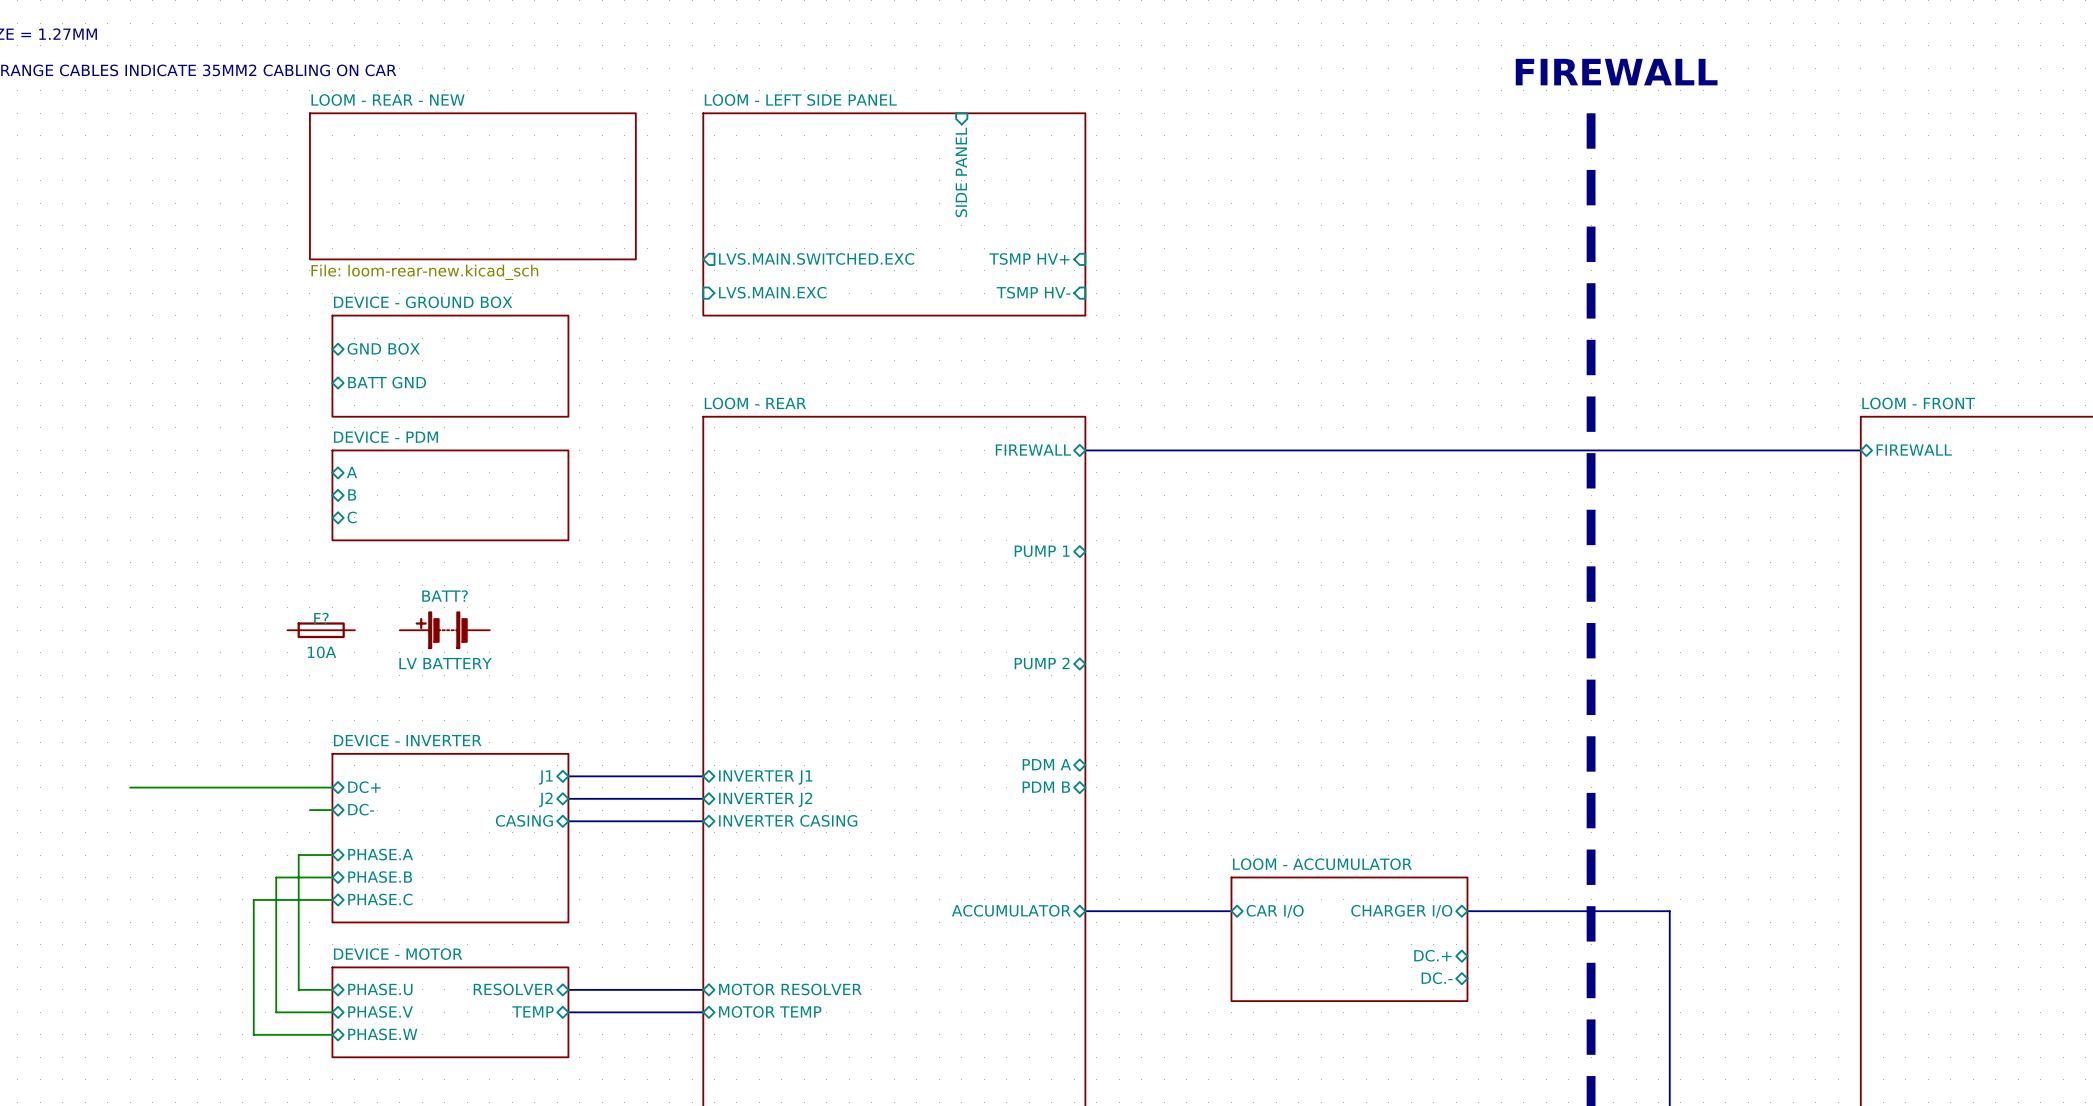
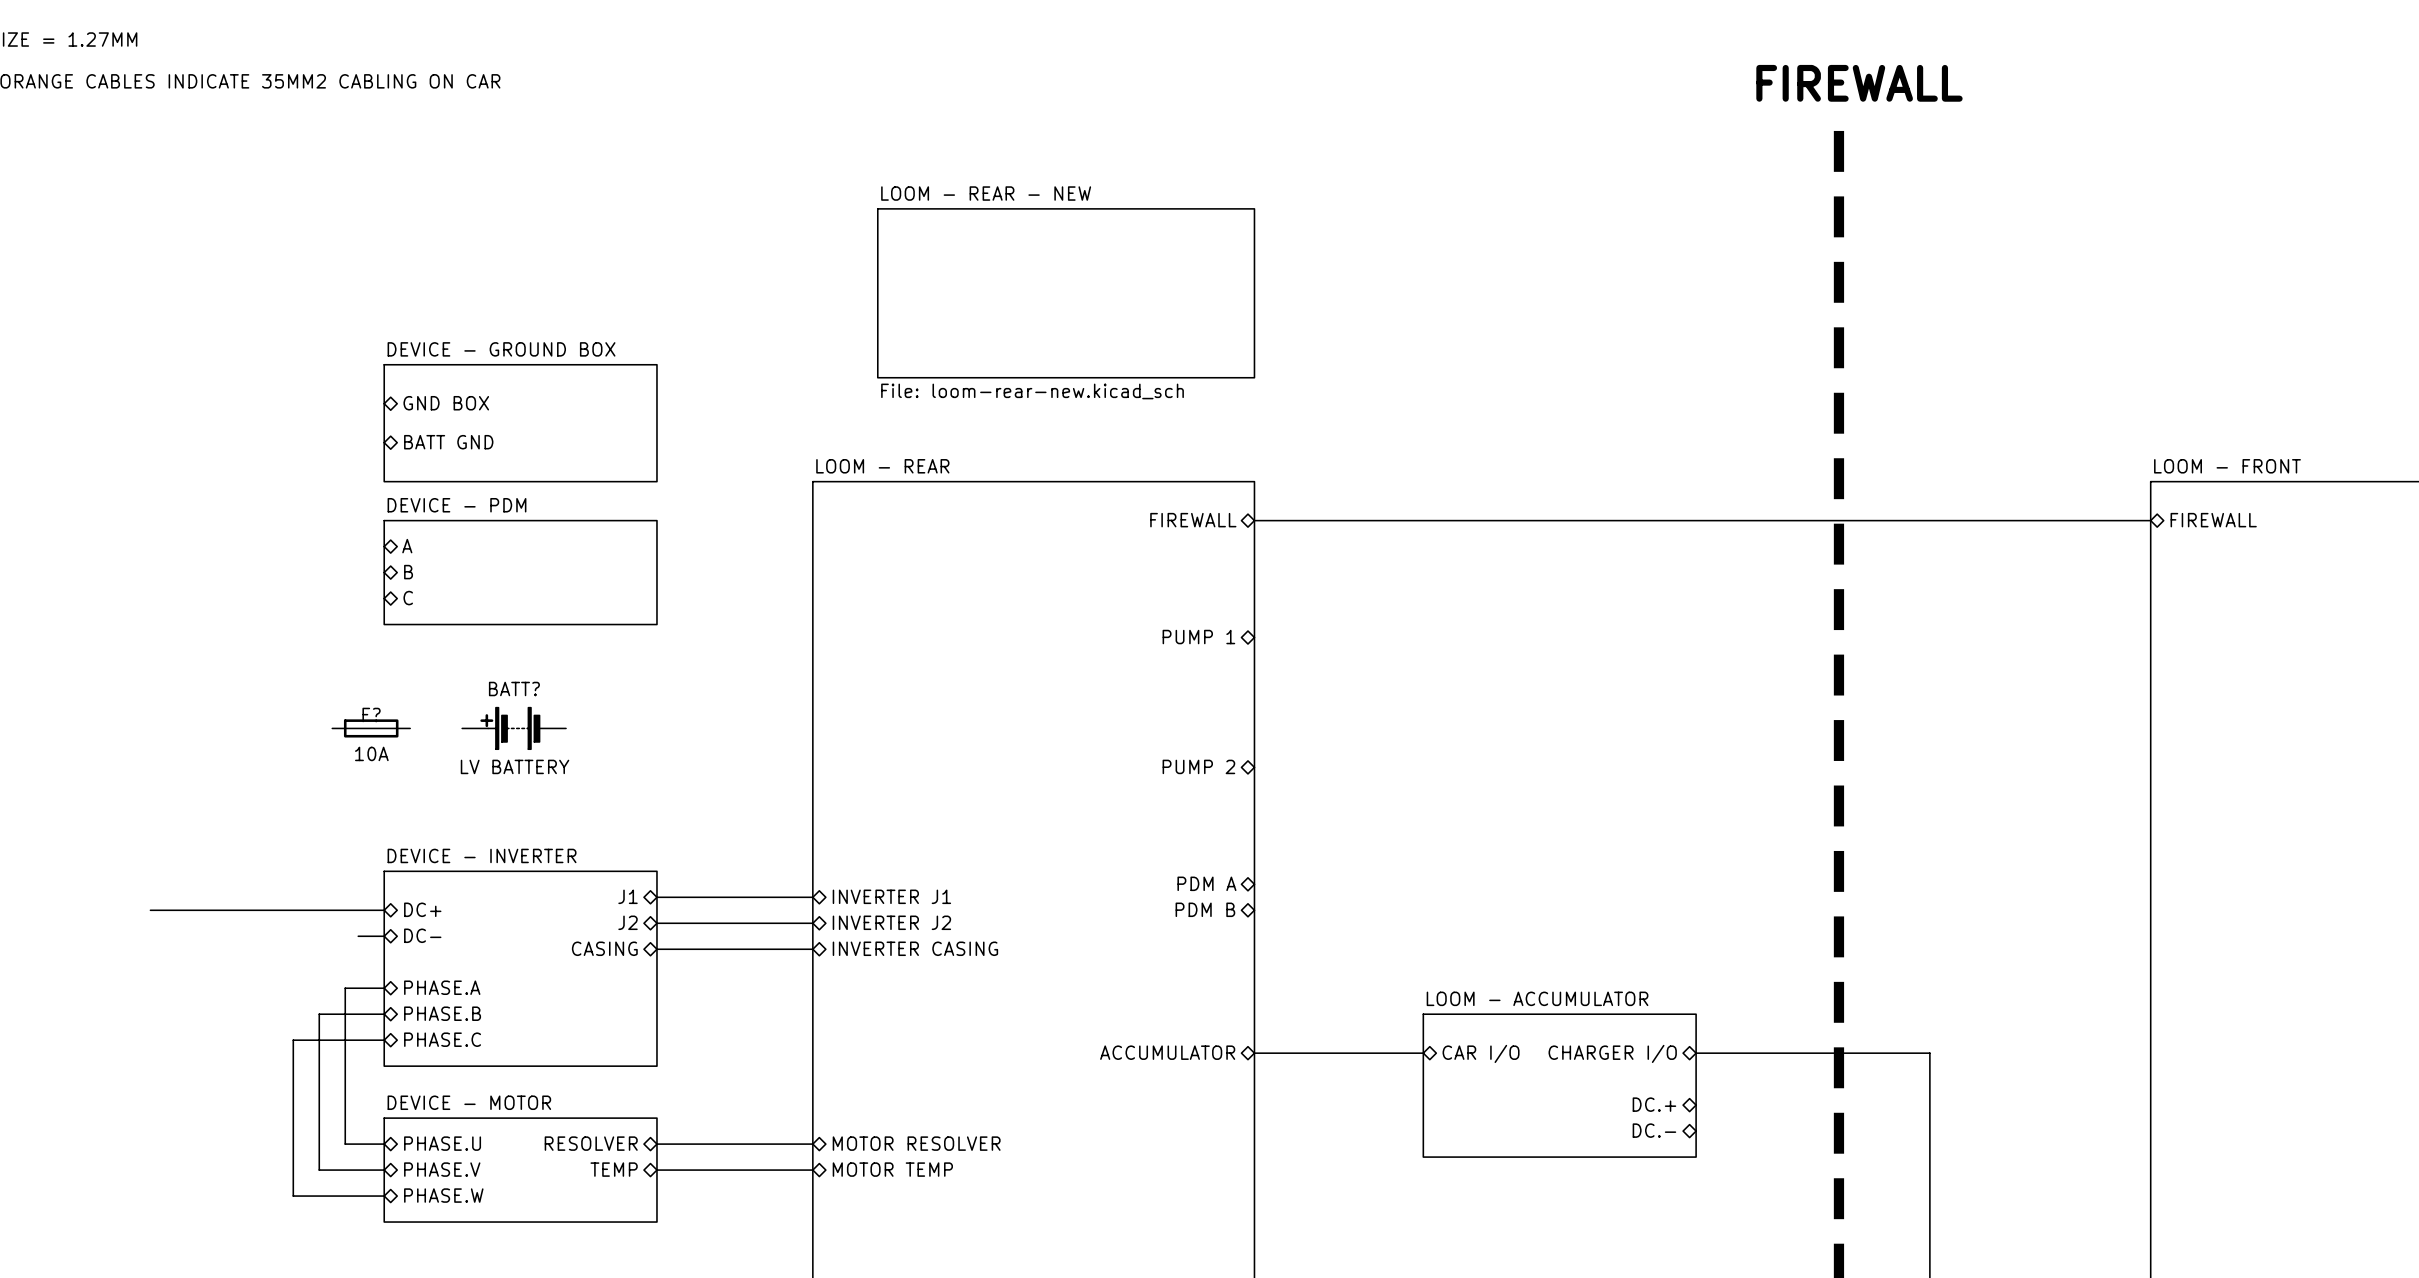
sheet pin: SIDE PANEL (961, 172) -> none
sheet LOOM - REAR - NEW: File: loom-rear-new.kicad_sch (472, 186) -> none
sheet LOOM - LEFT SIDE PANEL: (894, 214) -> none
sheet LOOM - REAR - NEW: none -> File: loom-rear-new.kicad_sch (1066, 293)
sheet pin: LVS.MAIN.SWITCHED.EXC (816, 258) -> none
sheet pin: TSMP HV+ (1029, 258) -> none
sheet pin: LVS.MAIN.EXC (772, 292) -> none
sheet pin: TSMP HV- (1033, 292) -> none

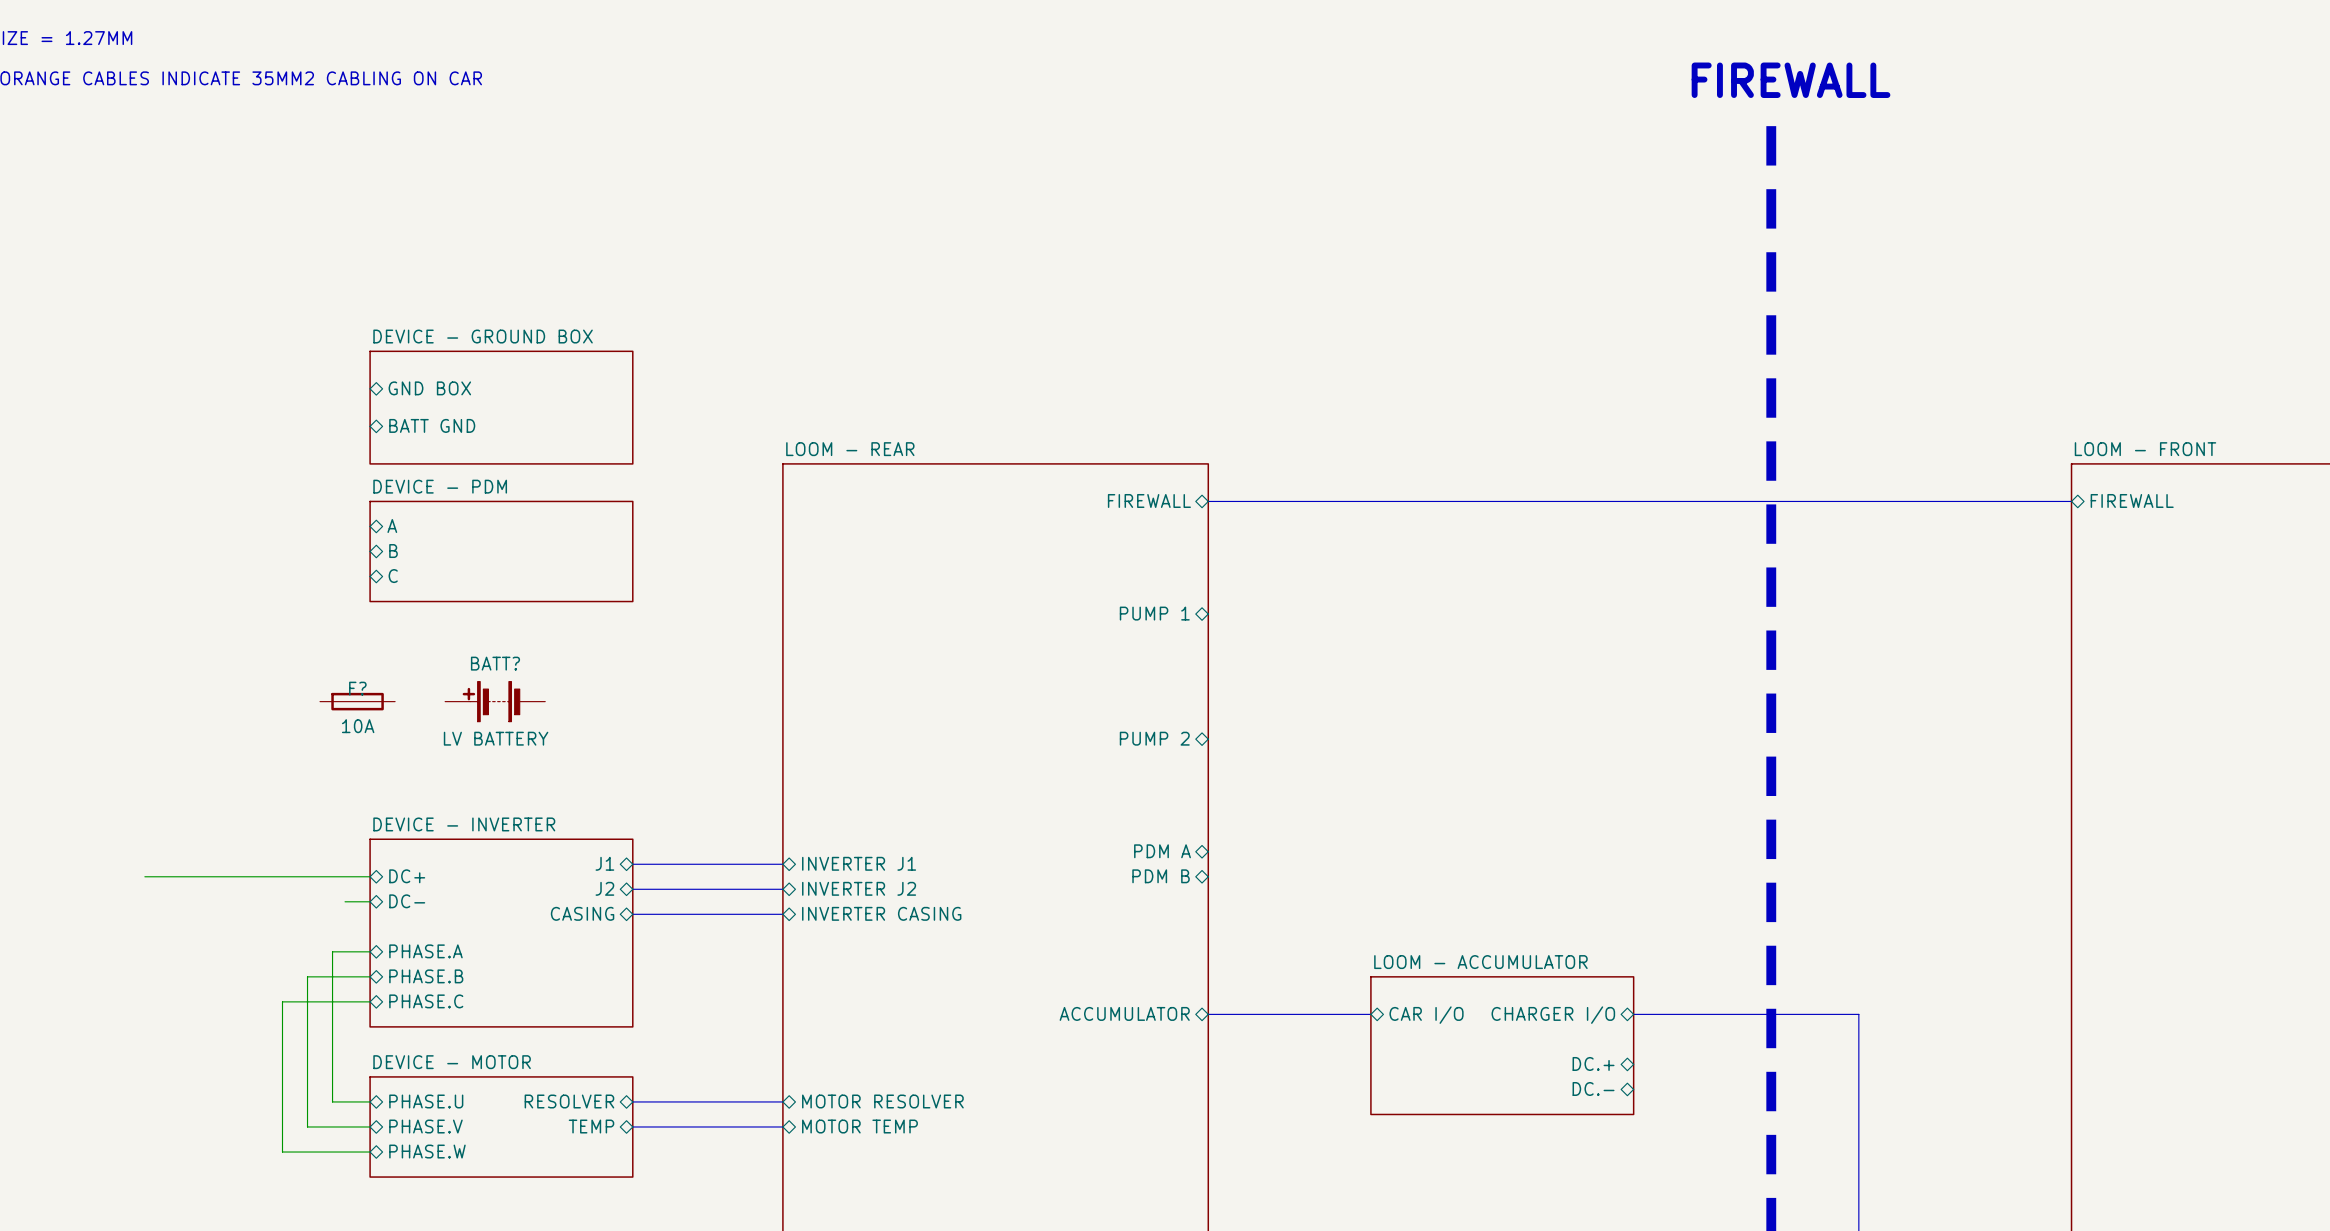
sheet LOOM - REAR - NEW: File: loom-rear-new.kicad_sch (1066, 293) -> none

